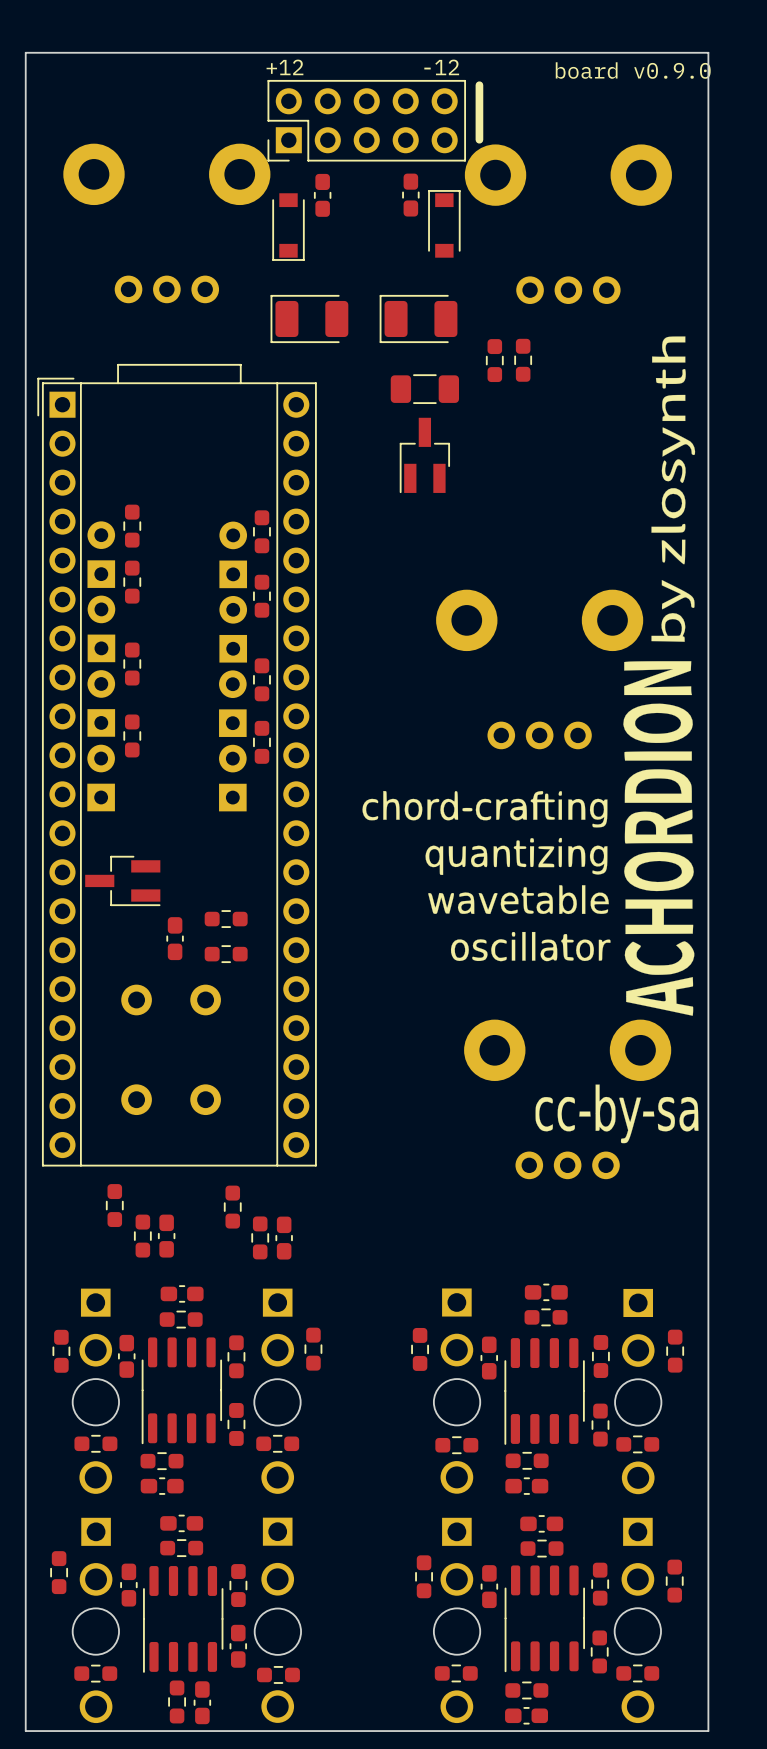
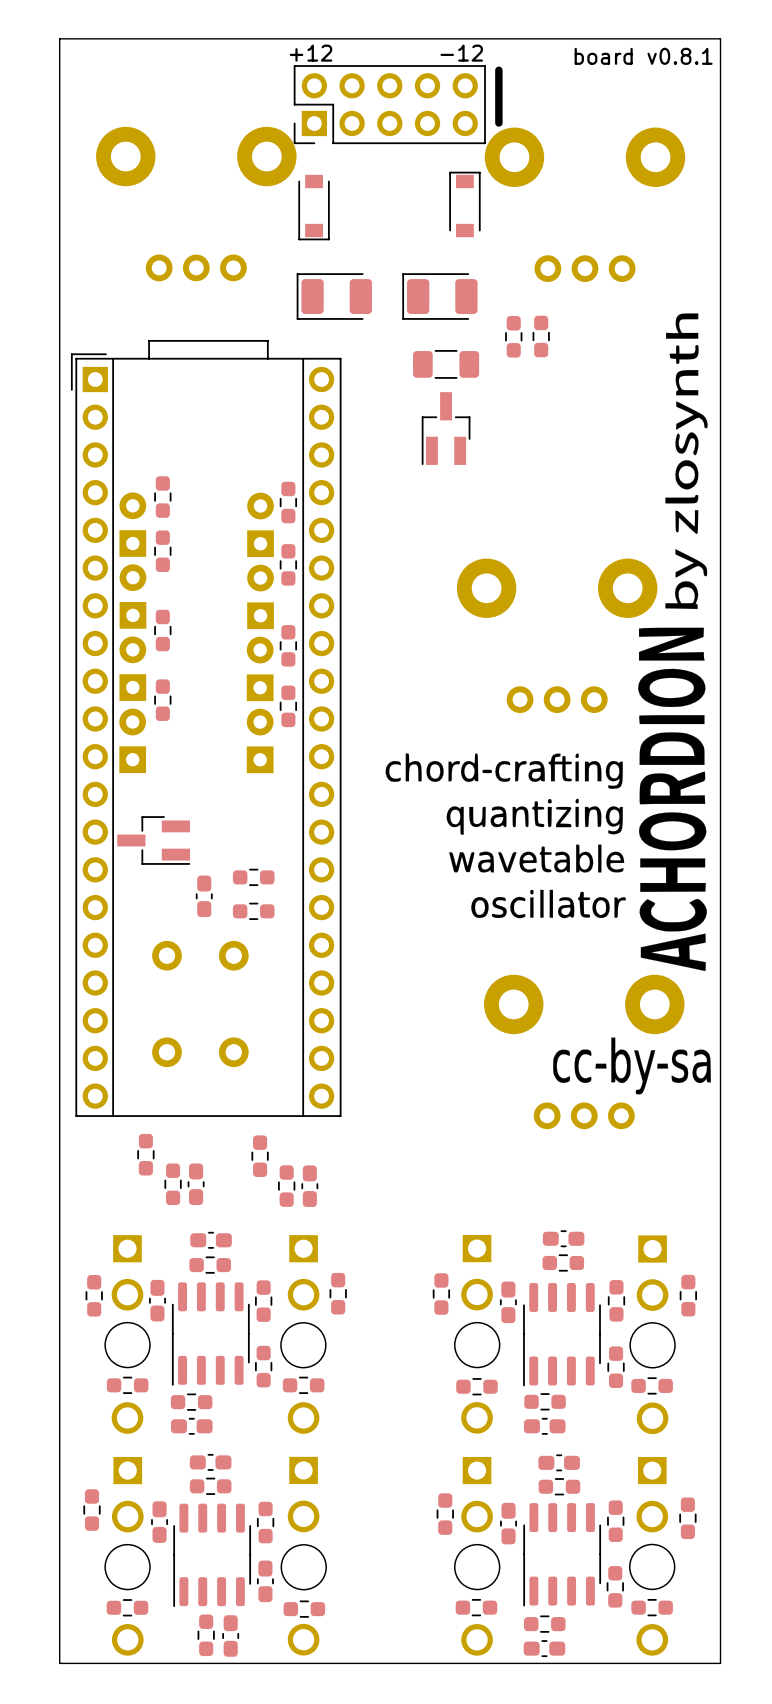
text: board v0.9.0 (633, 70) -> board v0.8.1 (643, 56)
part: (322, 195) -> none
part: (410, 195) -> none

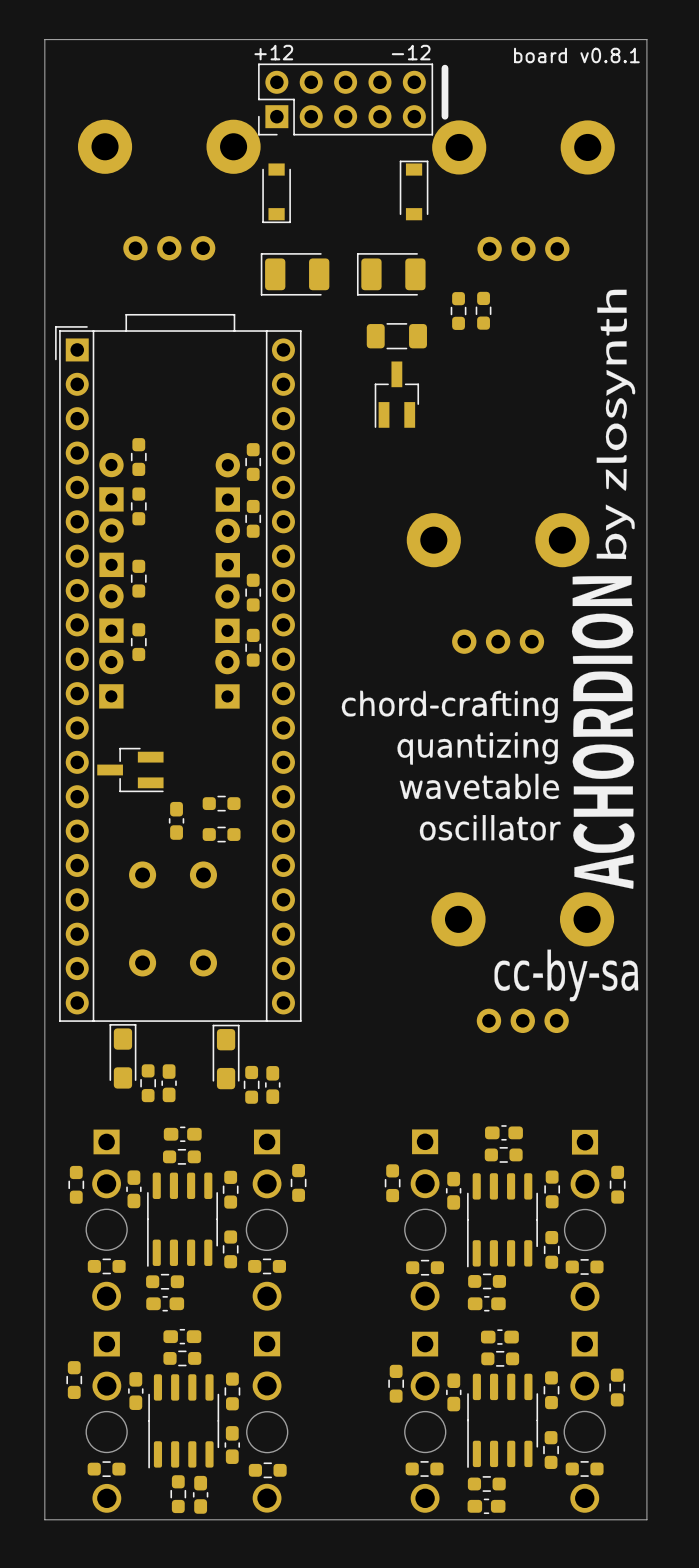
part footprint: [137, 1133, 155, 1176] -> [109, 1024, 137, 1089]
part footprint: [251, 1135, 269, 1177] -> [212, 1024, 240, 1090]

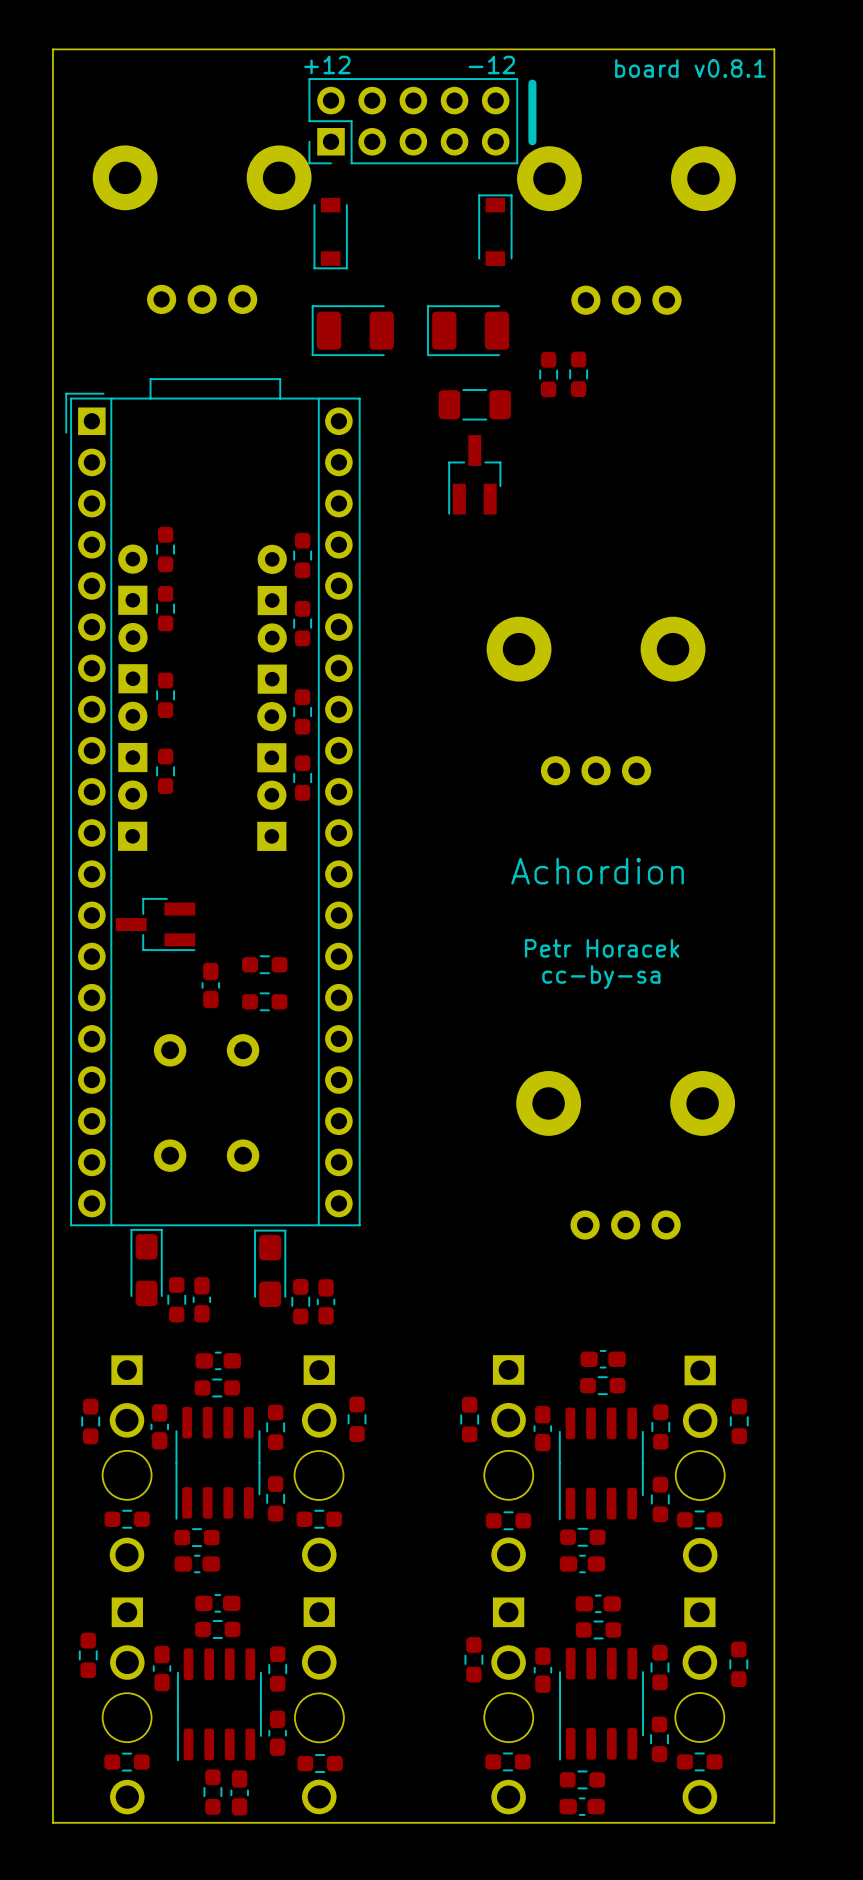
drawing: [341, 289, 639, 1002] -> none
text: none -> Achordion (597, 871)
text: none -> Petr Horacek (602, 948)
text: none -> cc-by-sa (601, 977)

